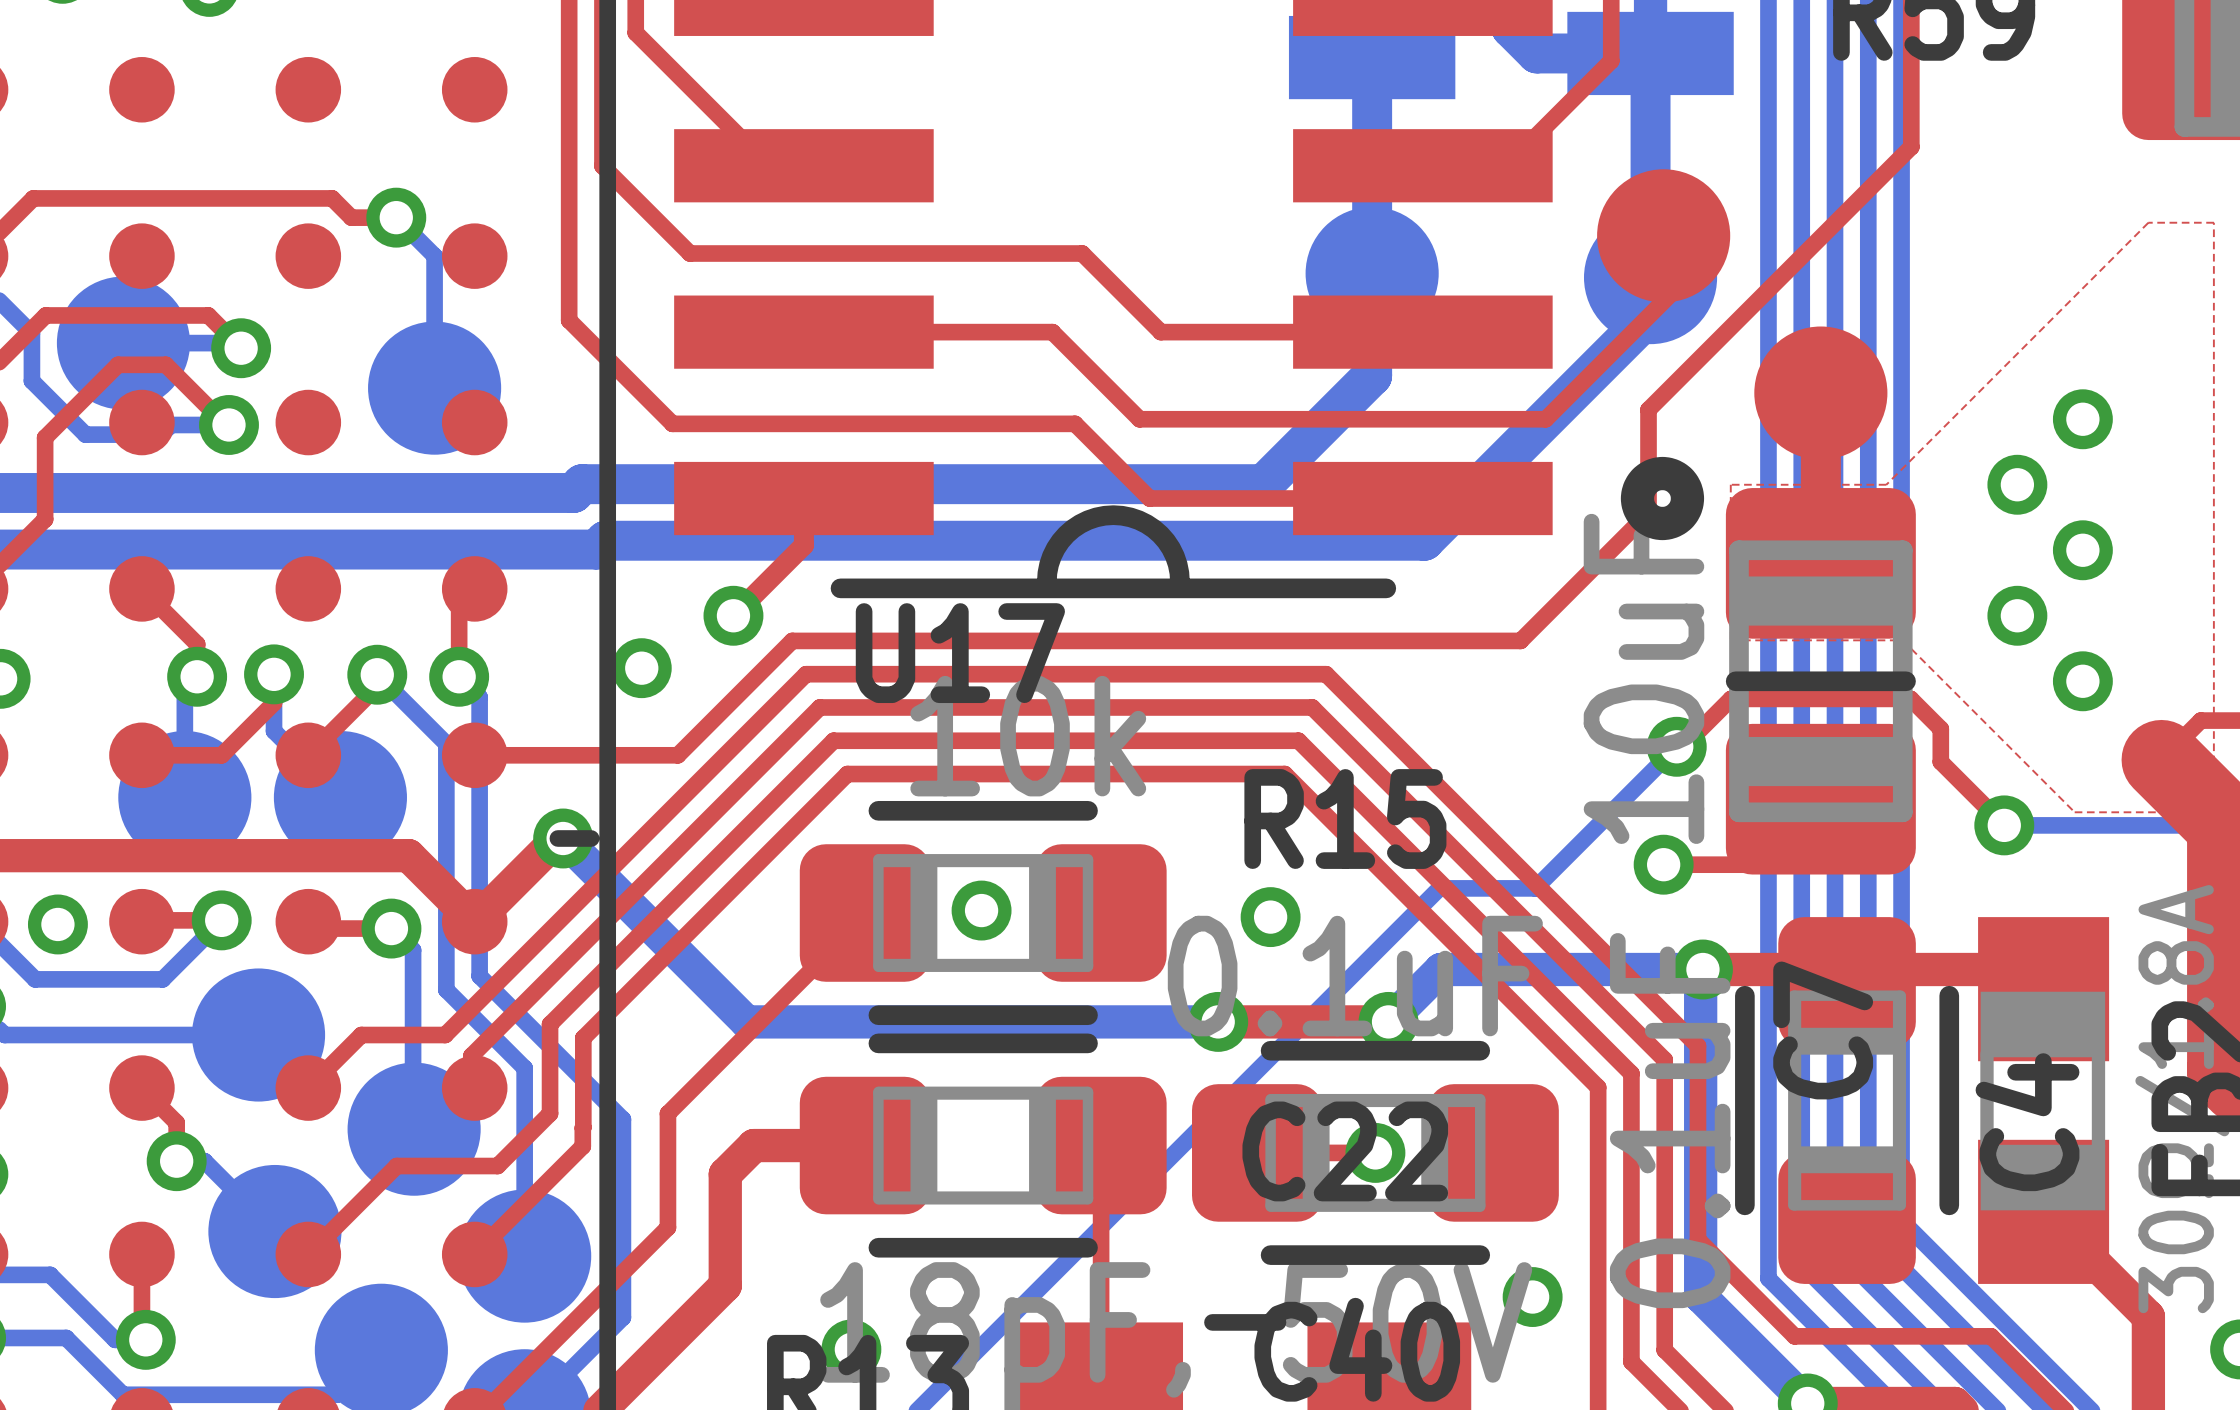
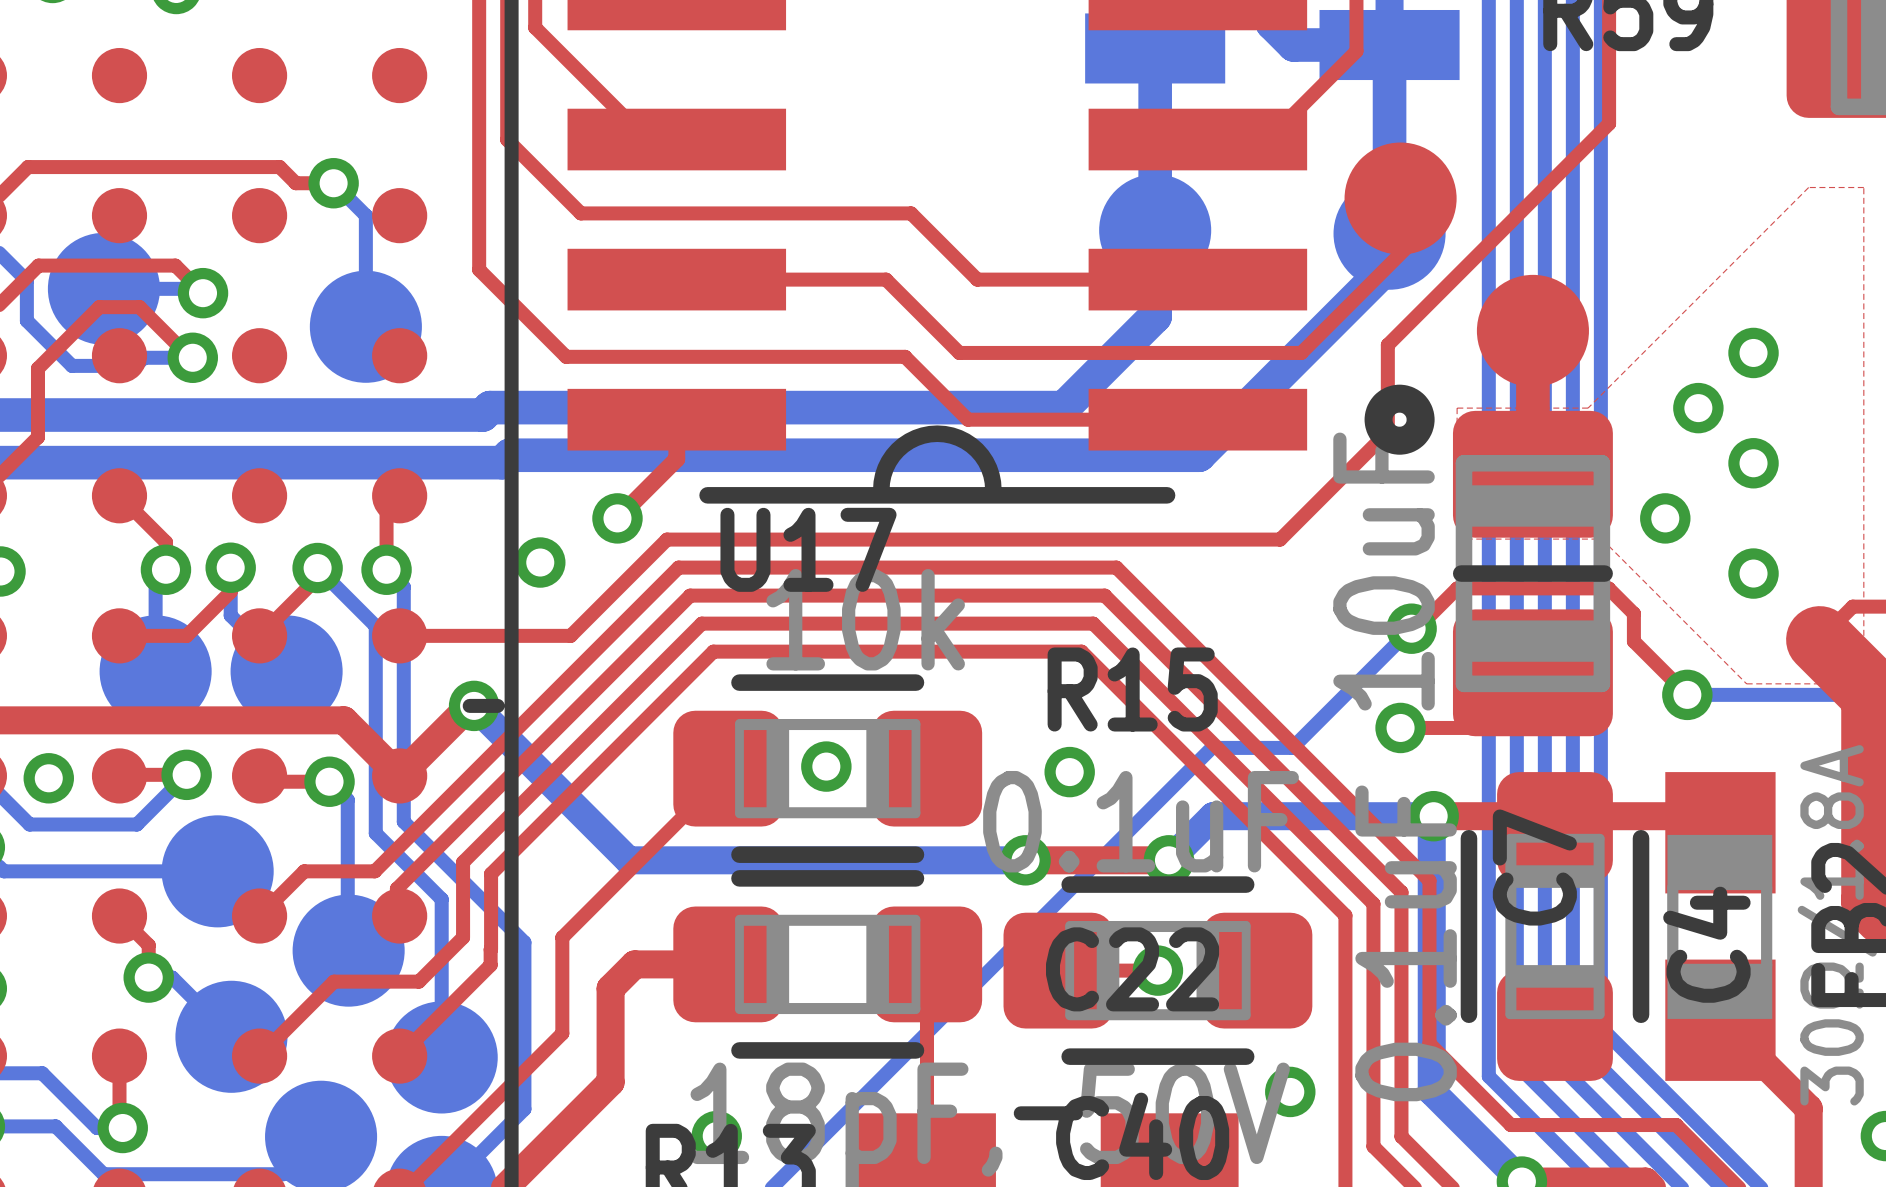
via position: (2017, 615) -> (1665, 518)

